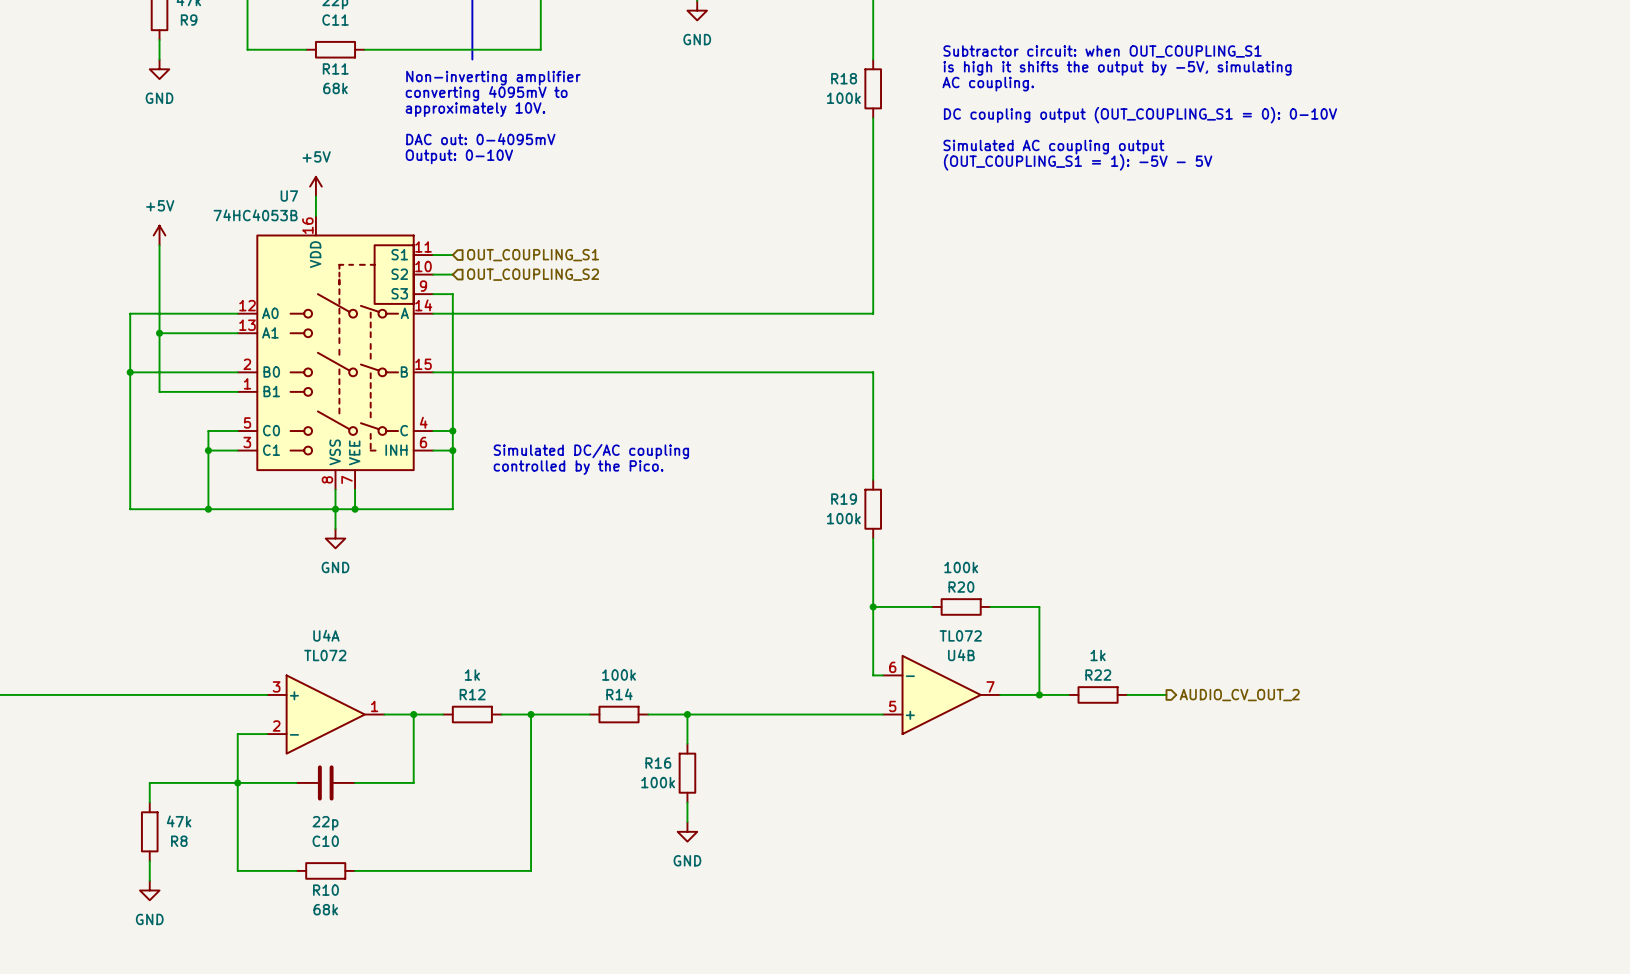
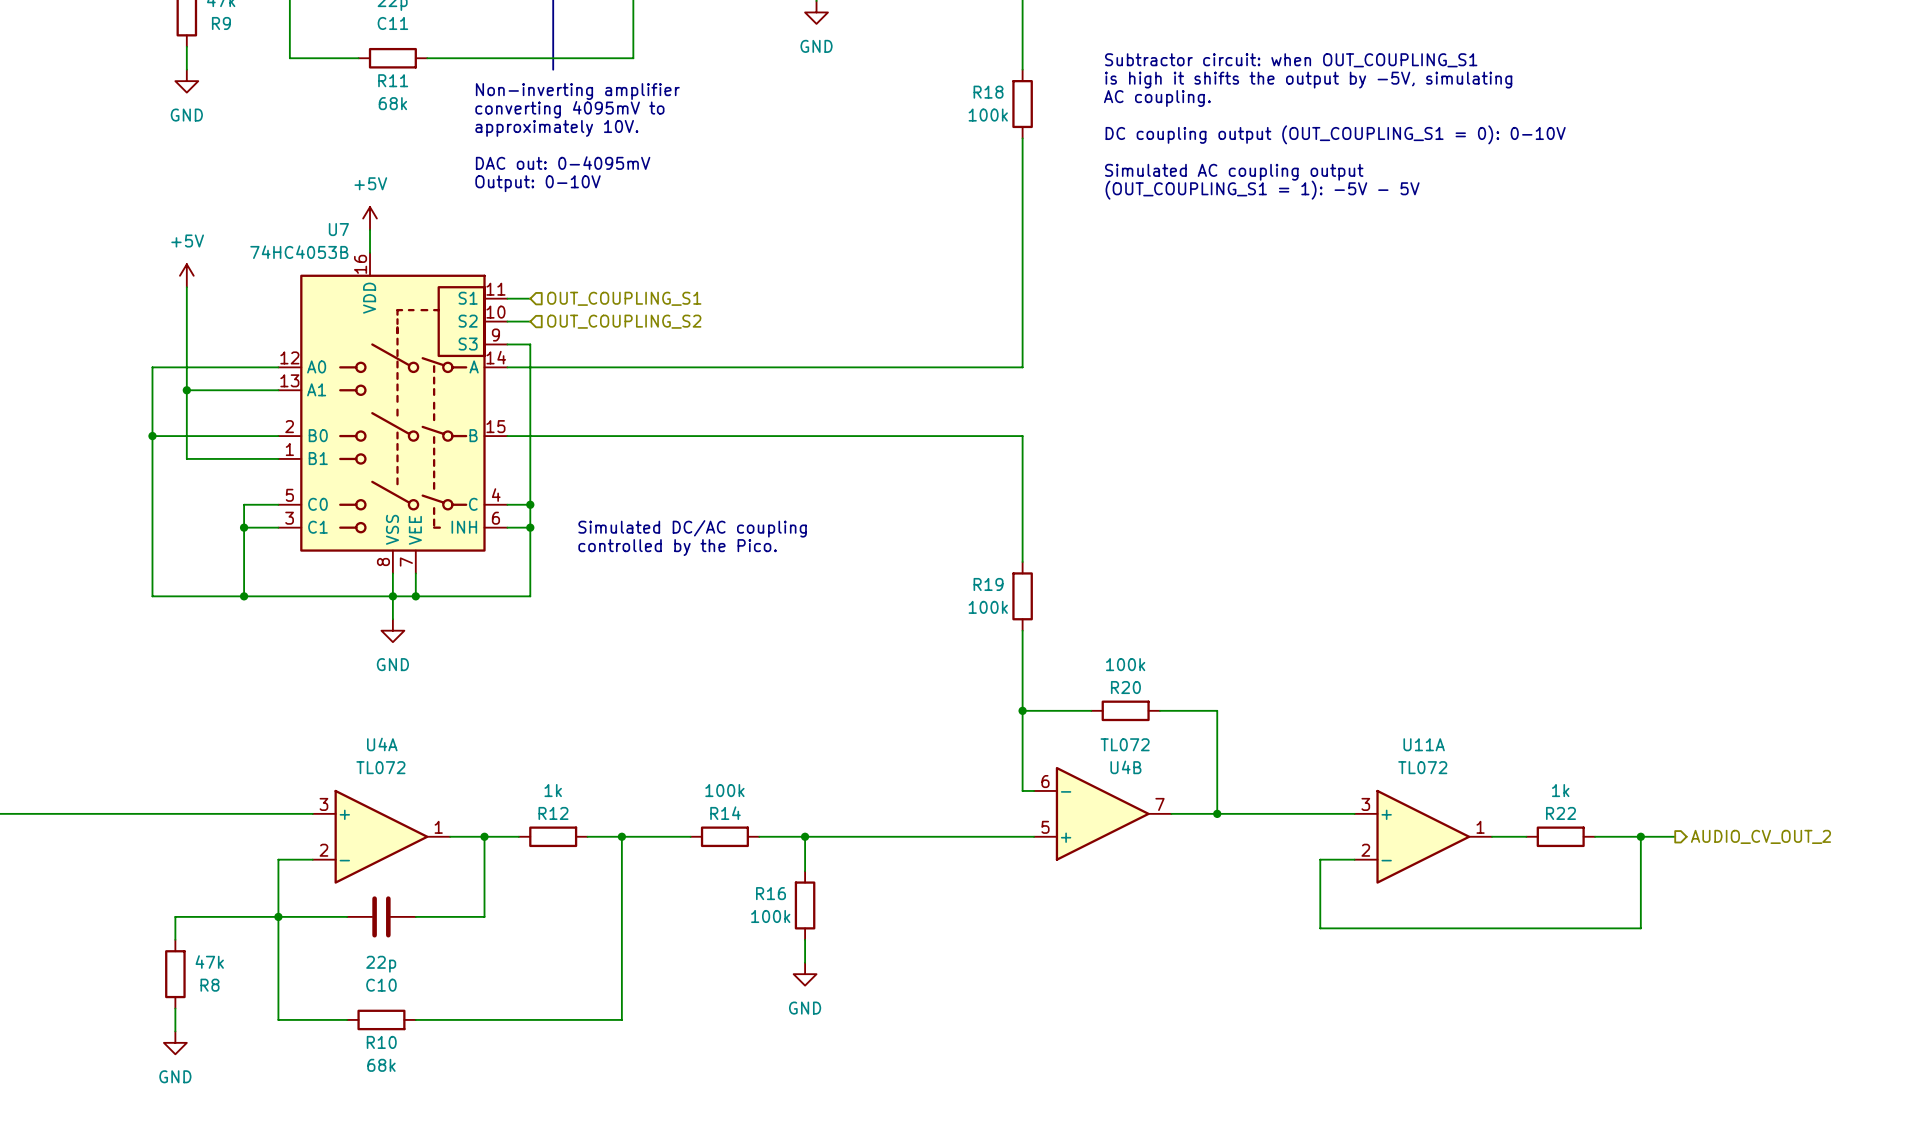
wire: none -> (1251, 813) (1320, 813)
R22 position: (1098, 694) -> (1560, 836)
hierarchical label: AUDIO_CV_OUT_2 (1239, 695) -> none
U11A: none -> TL072 (1423, 836)
wire: none -> (1492, 836) (1526, 836)
wire: none -> (1595, 836) (1675, 836)
wire: none -> (1640, 836) (1640, 928) (1320, 928) (1320, 859) (1354, 859)
junction: none -> (1640, 836)
hierarchical label: none -> AUDIO_CV_OUT_2 (1760, 836)

